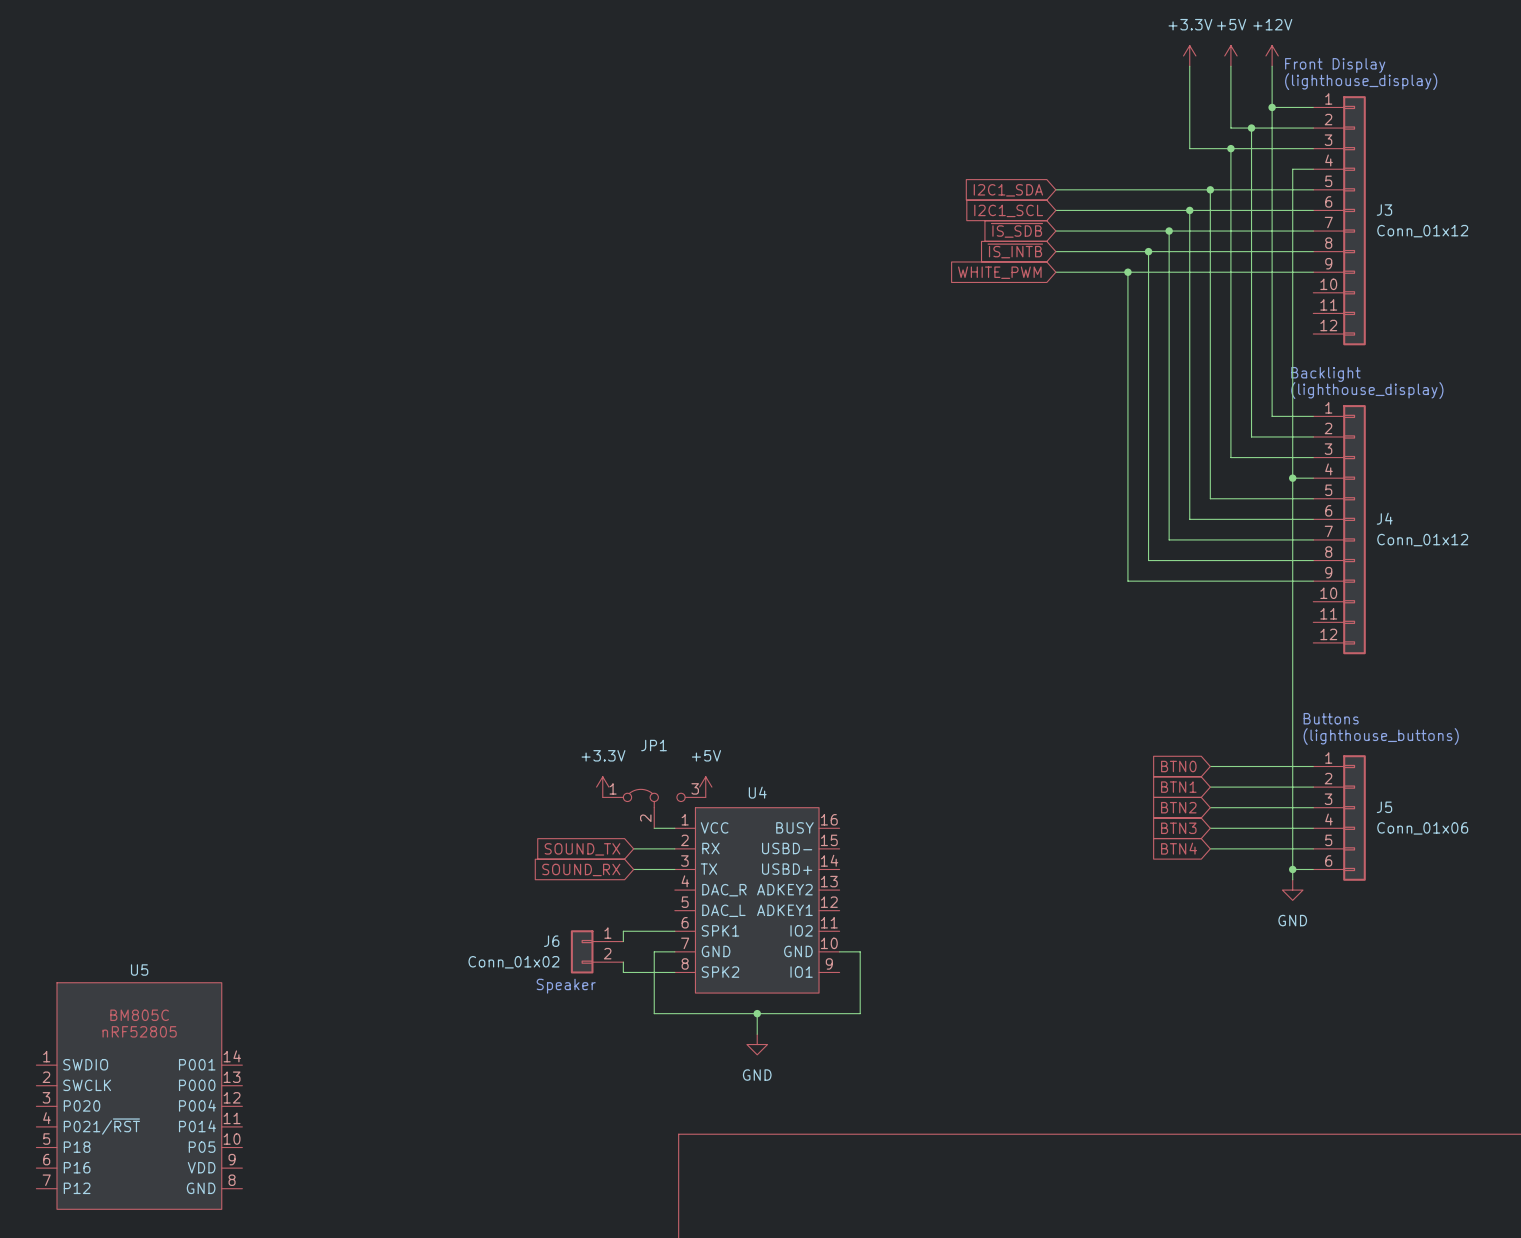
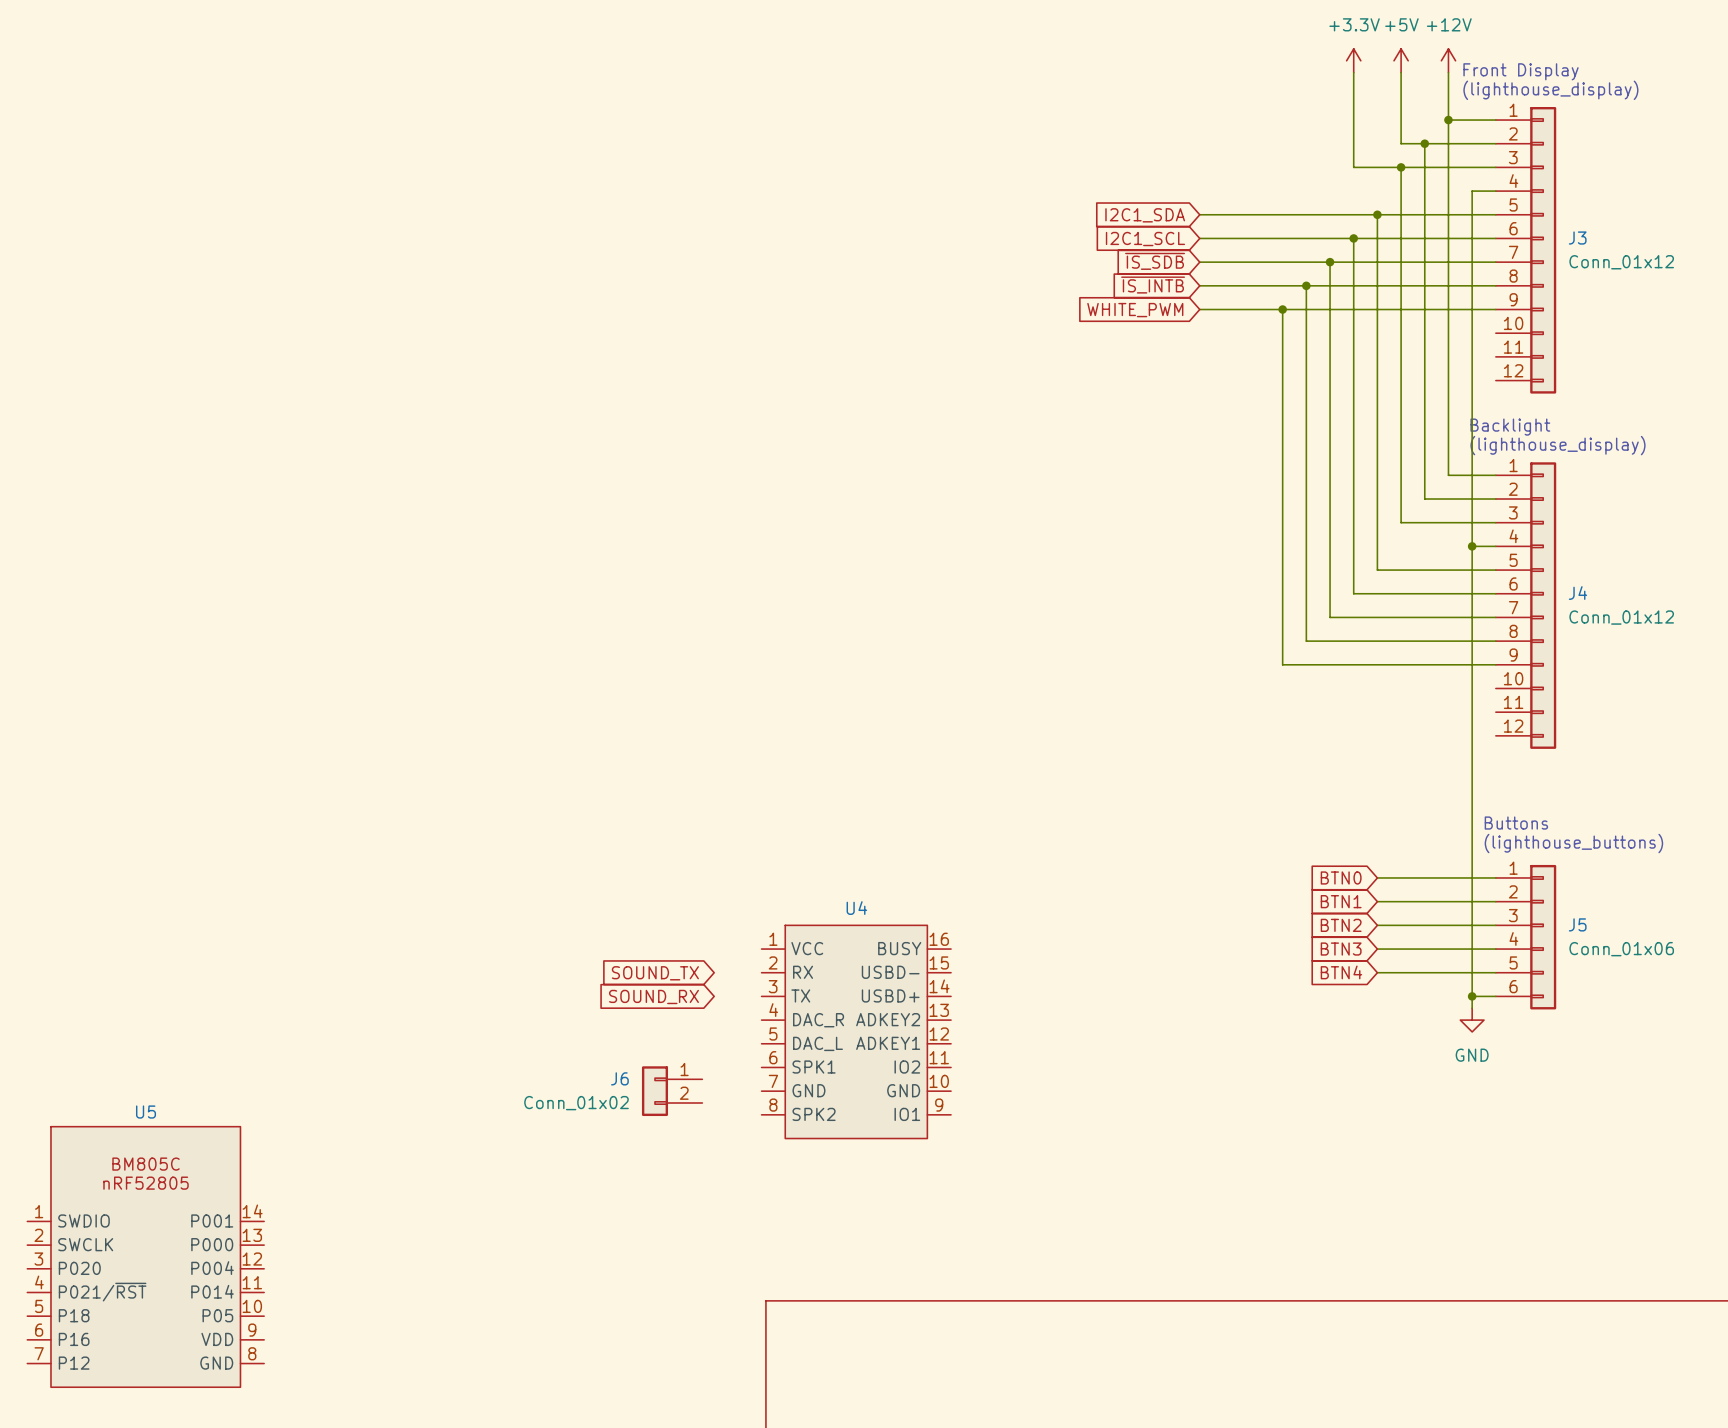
power symbol: +3.3V (602, 787) -> none
power symbol: +5V (705, 787) -> none
JP1: (654, 808) -> none
wire: (654, 828) (674, 828) -> none
wire: (633, 848) (674, 848) -> none
wire: (633, 869) (674, 869) -> none
wire: (674, 931) (623, 931) (623, 941) -> none
wire: (674, 951) (654, 951) (654, 1013) (860, 1013) (860, 951) (839, 951) -> none
wire: (623, 962) (623, 972) (674, 972) -> none
text: Speaker (566, 986) -> none
wire: (757, 1013) (757, 1034) -> none
junction: (757, 1013) -> none
power symbol: GND (757, 1044) -> none

